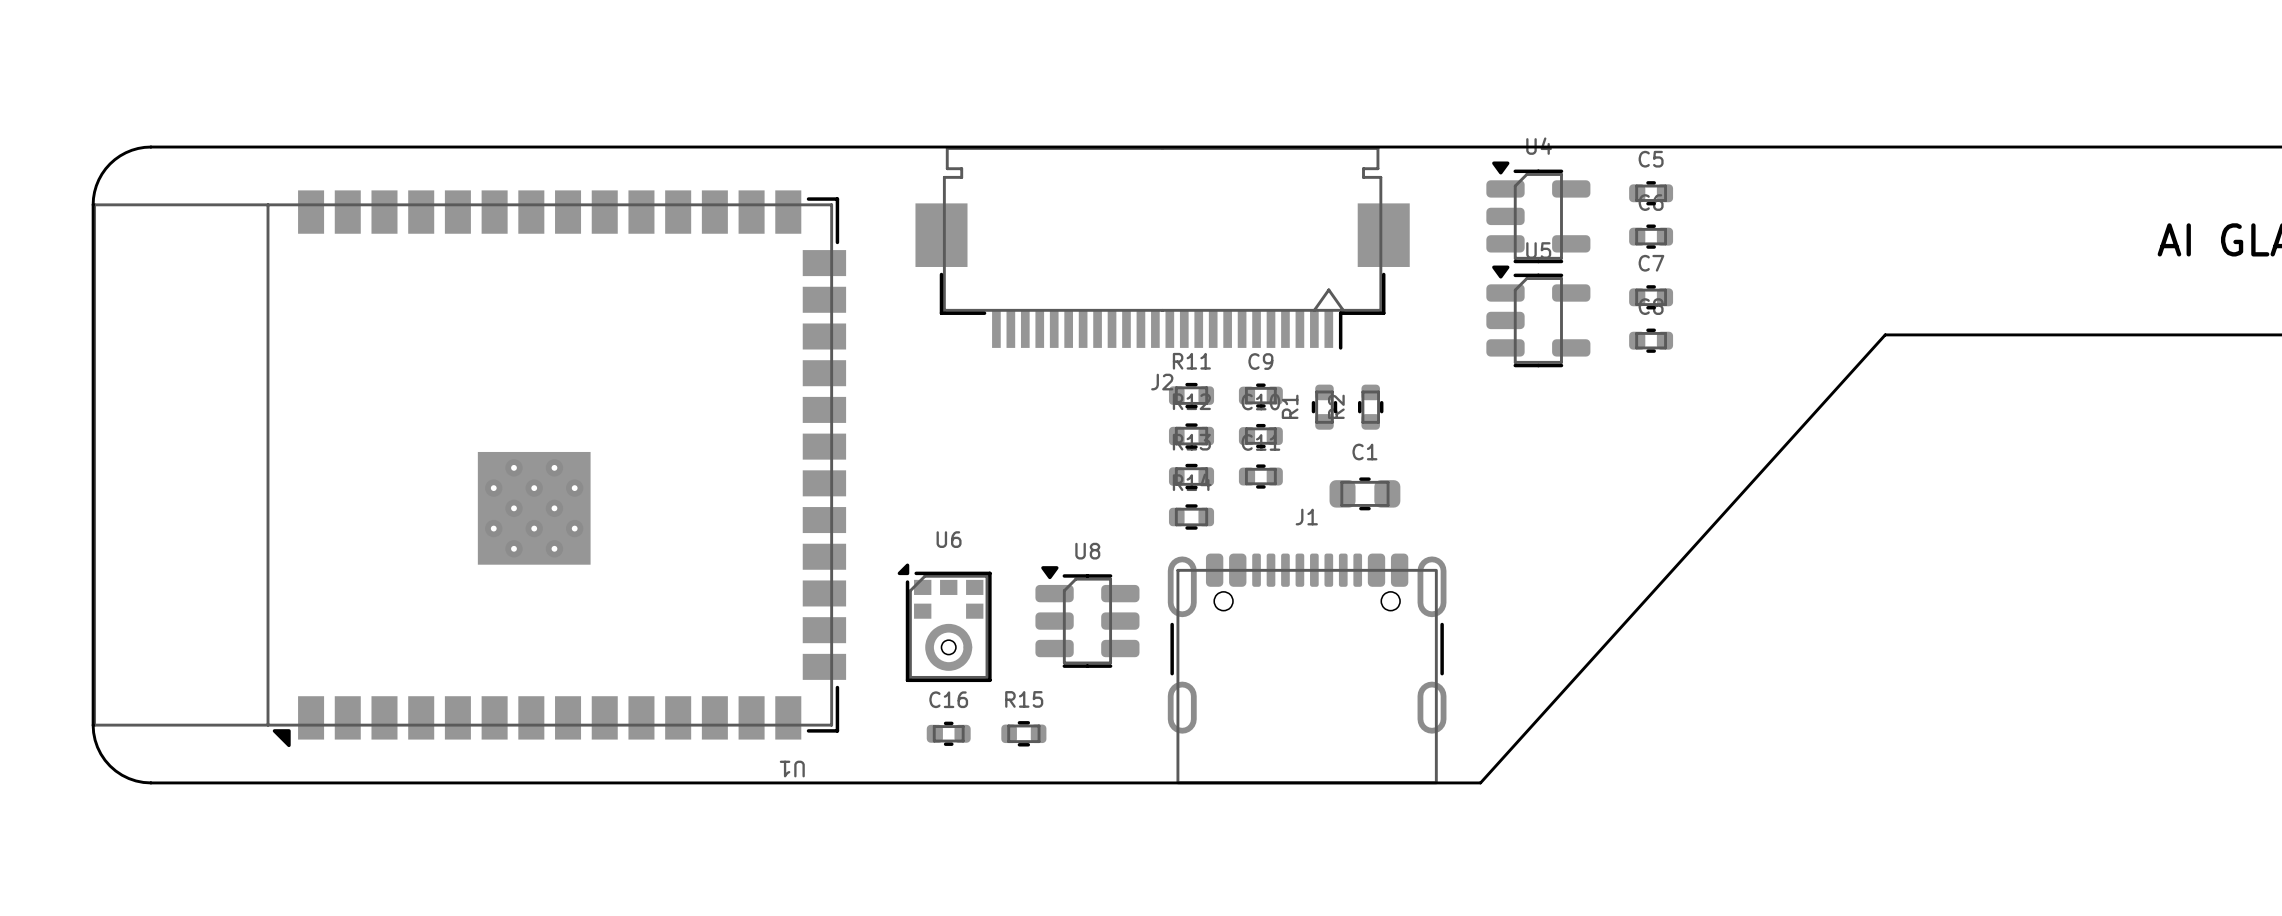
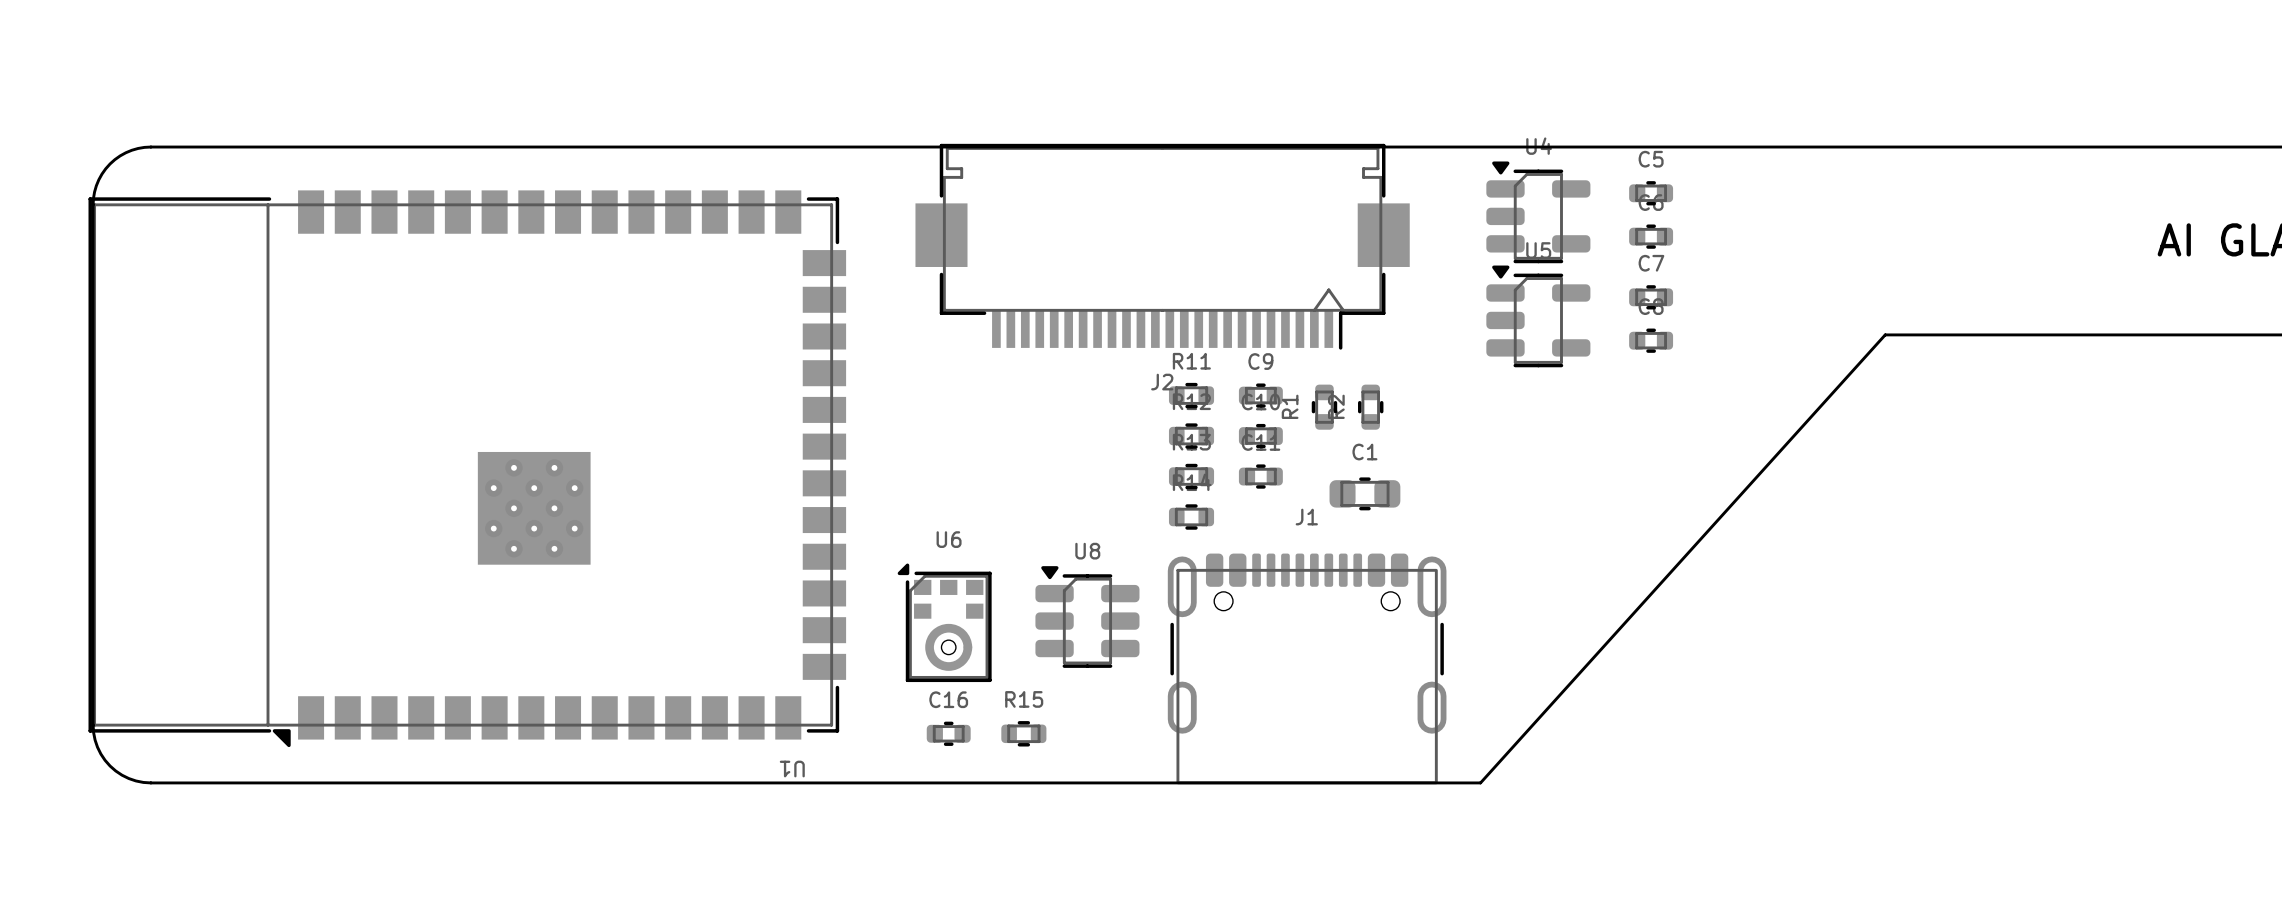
J2 footprint: [915, 147, 1410, 350] -> [915, 143, 1410, 350]
U1 footprint: [93, 190, 847, 748] -> [88, 190, 847, 748]

